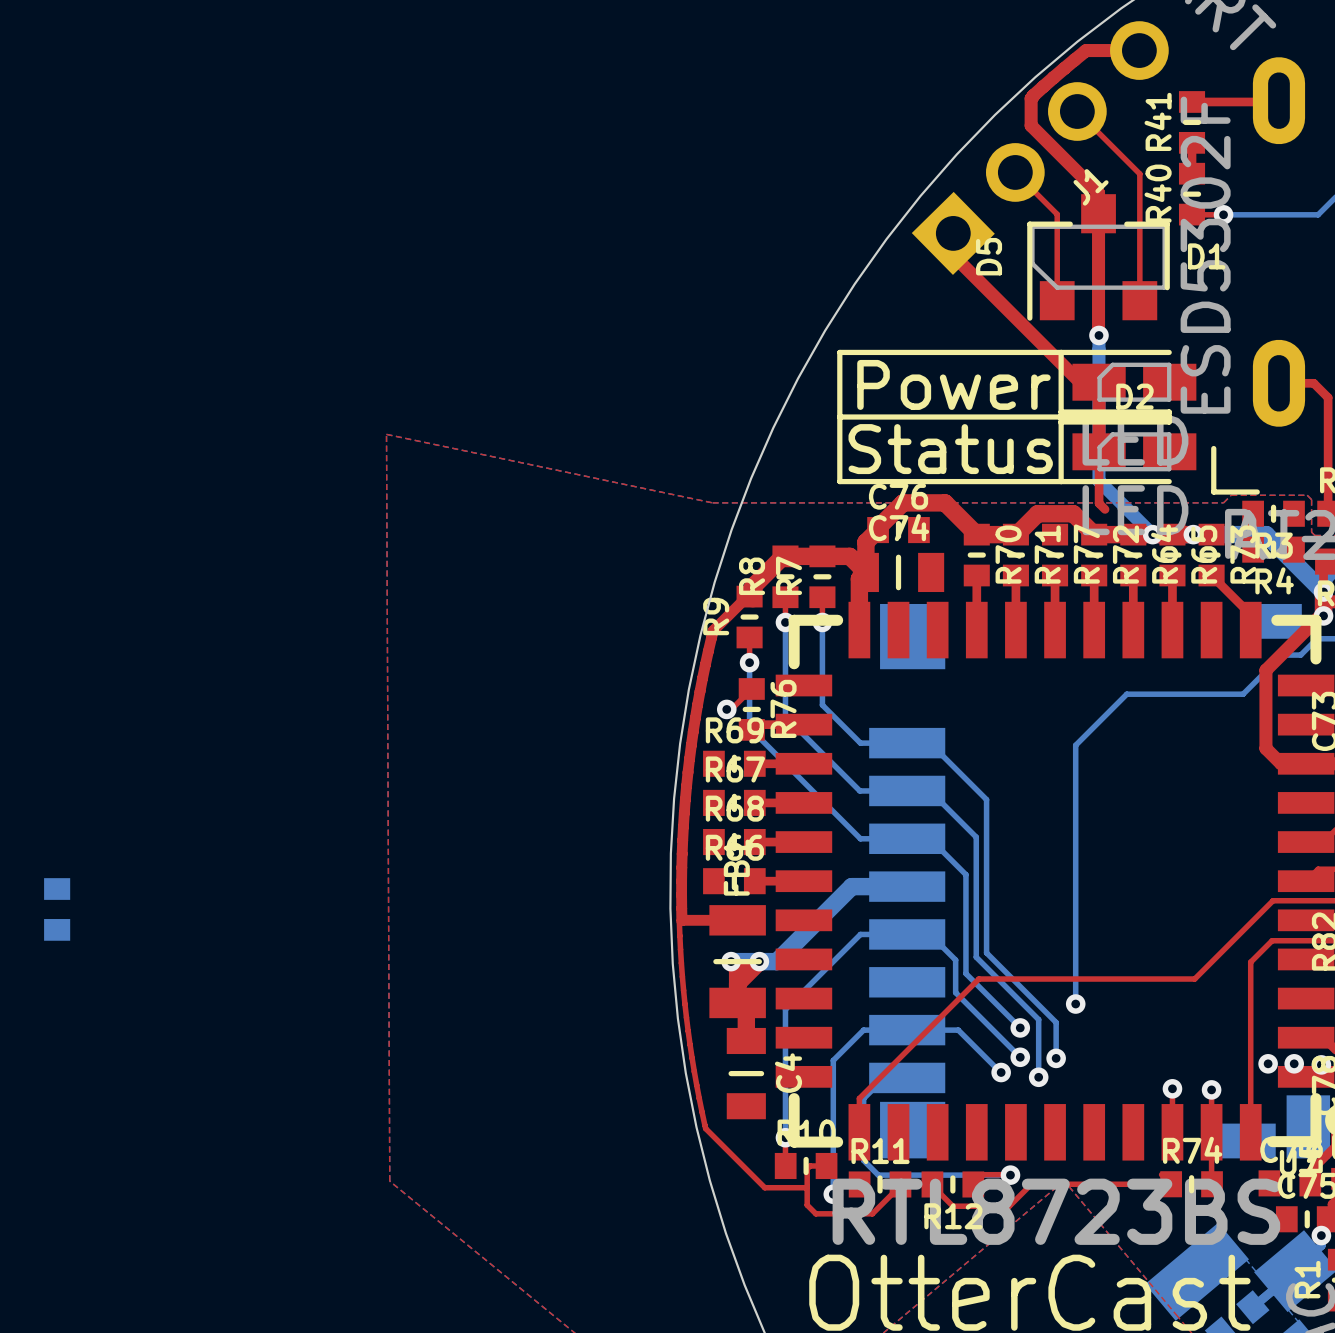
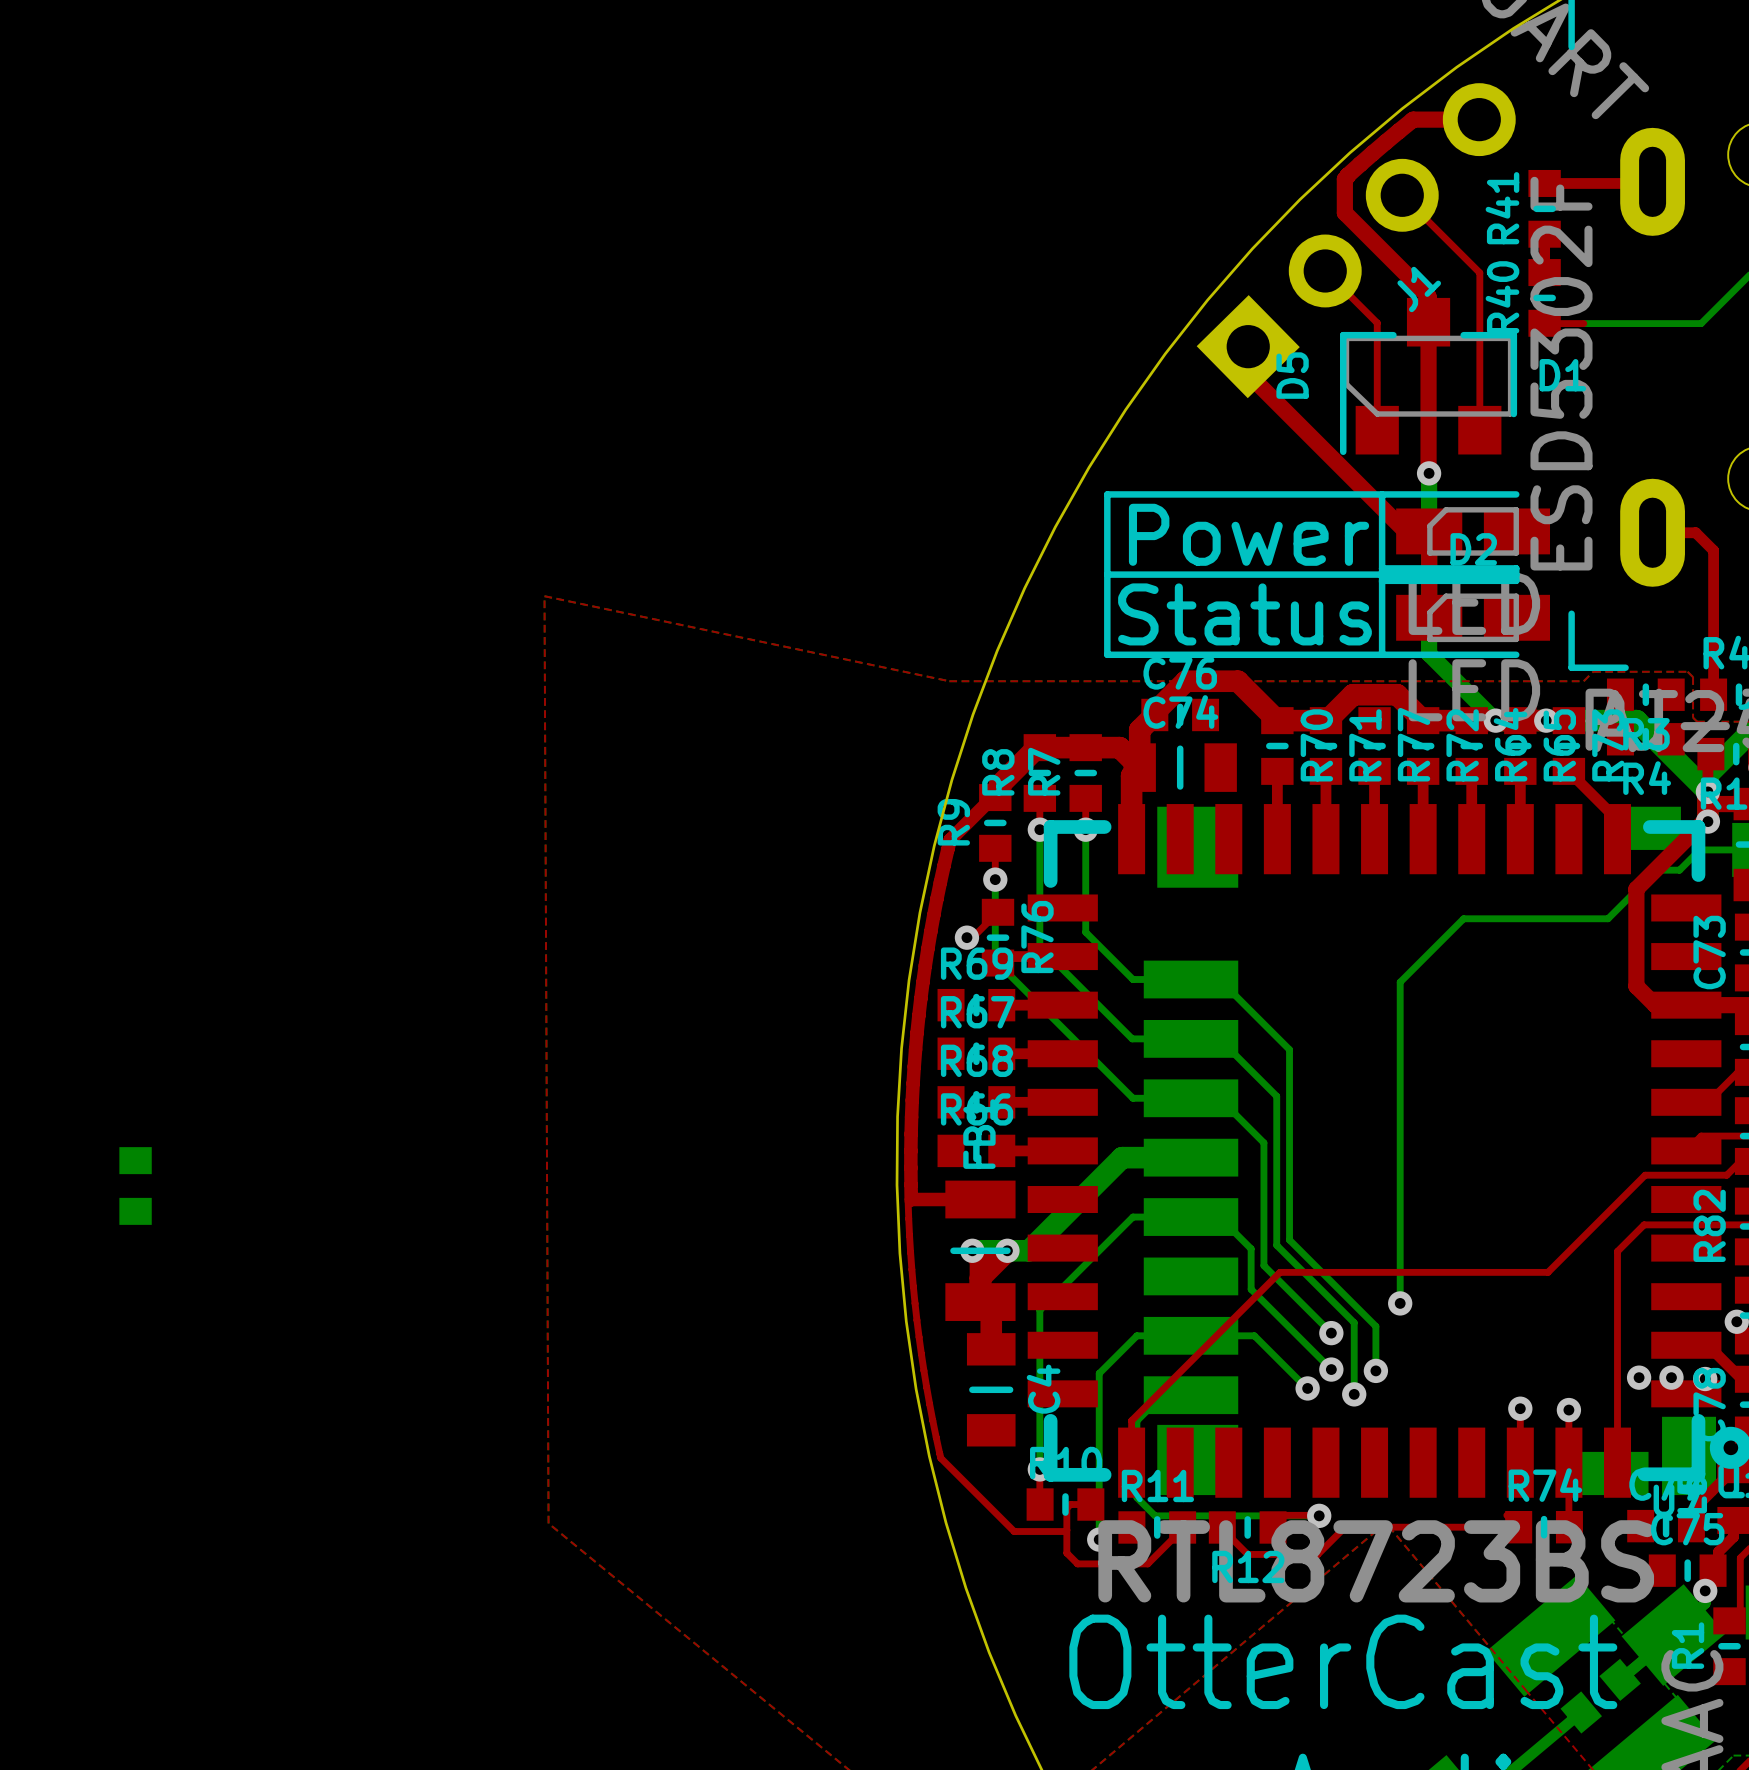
via: (1223, 214) -> none
top track: (1099, 451) (1099, 503) (1105, 509) -> none

